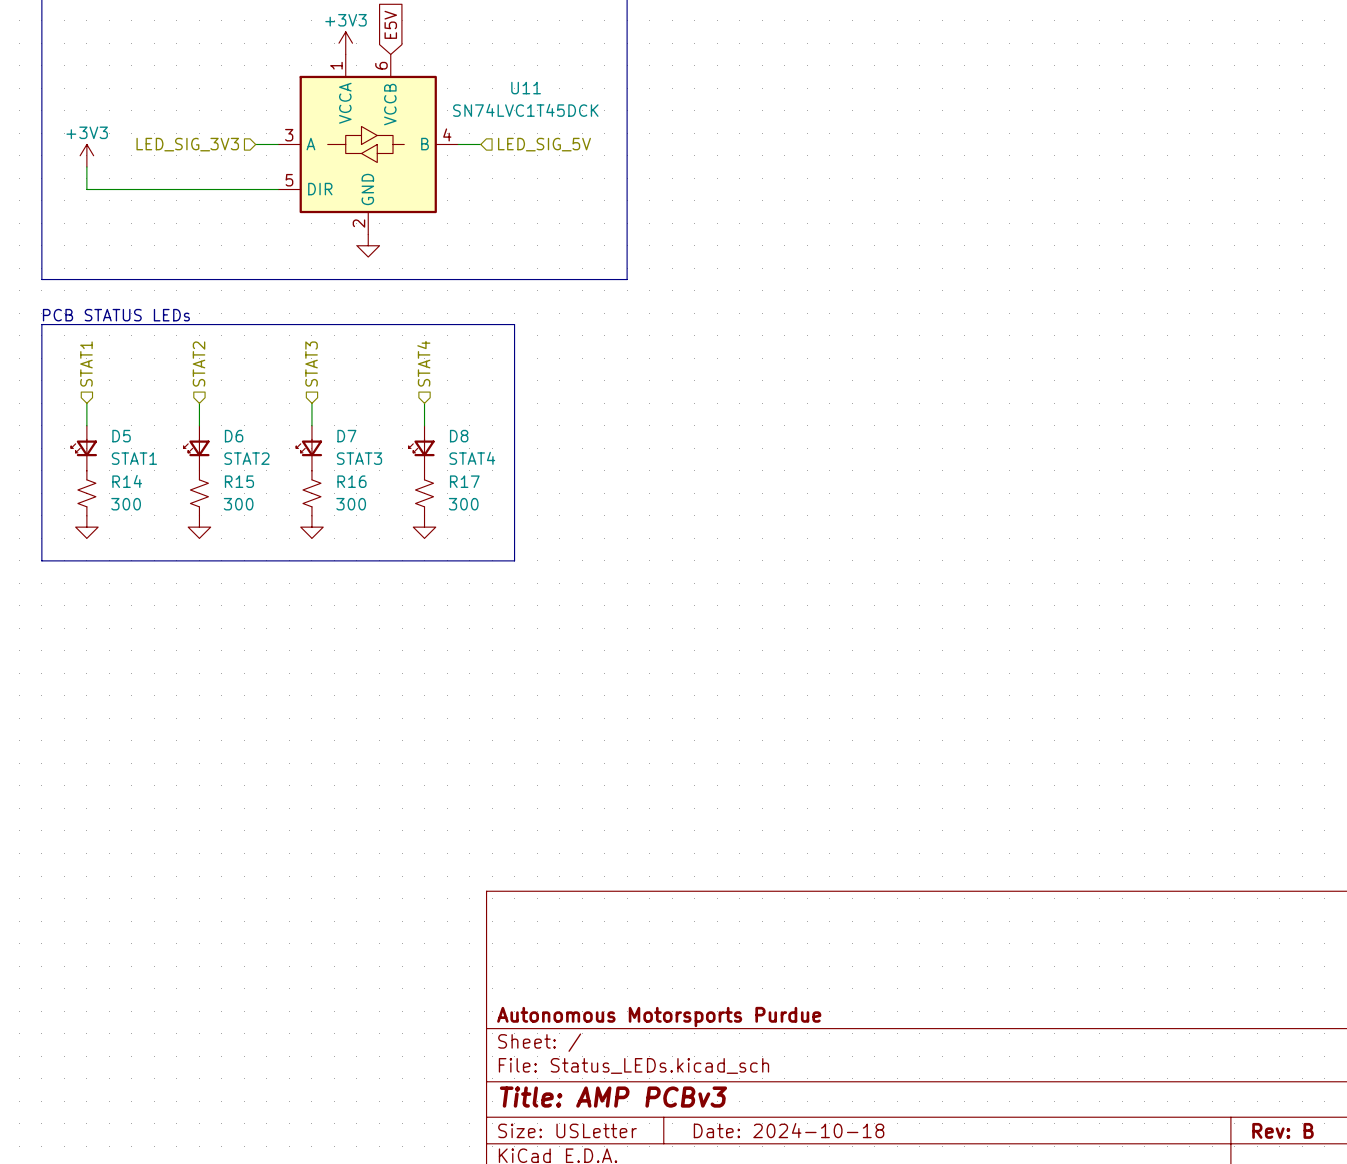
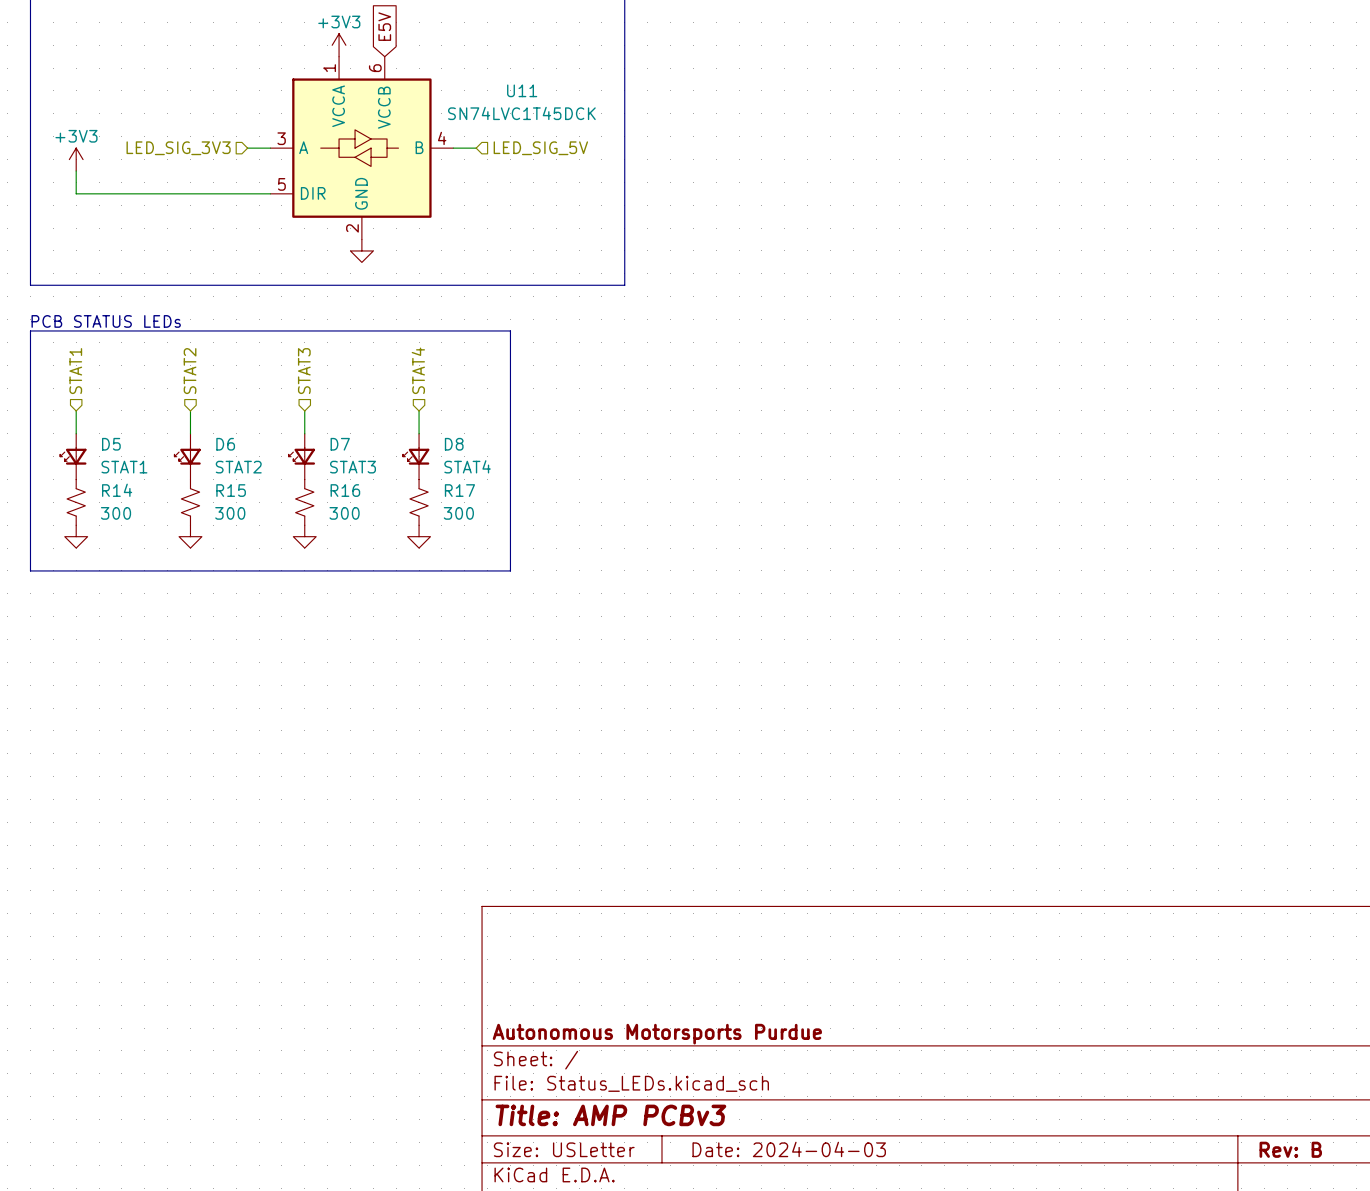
title block: Date: 2024-10-18 (789, 1130) -> Date: 2024-04-03 (789, 1149)

